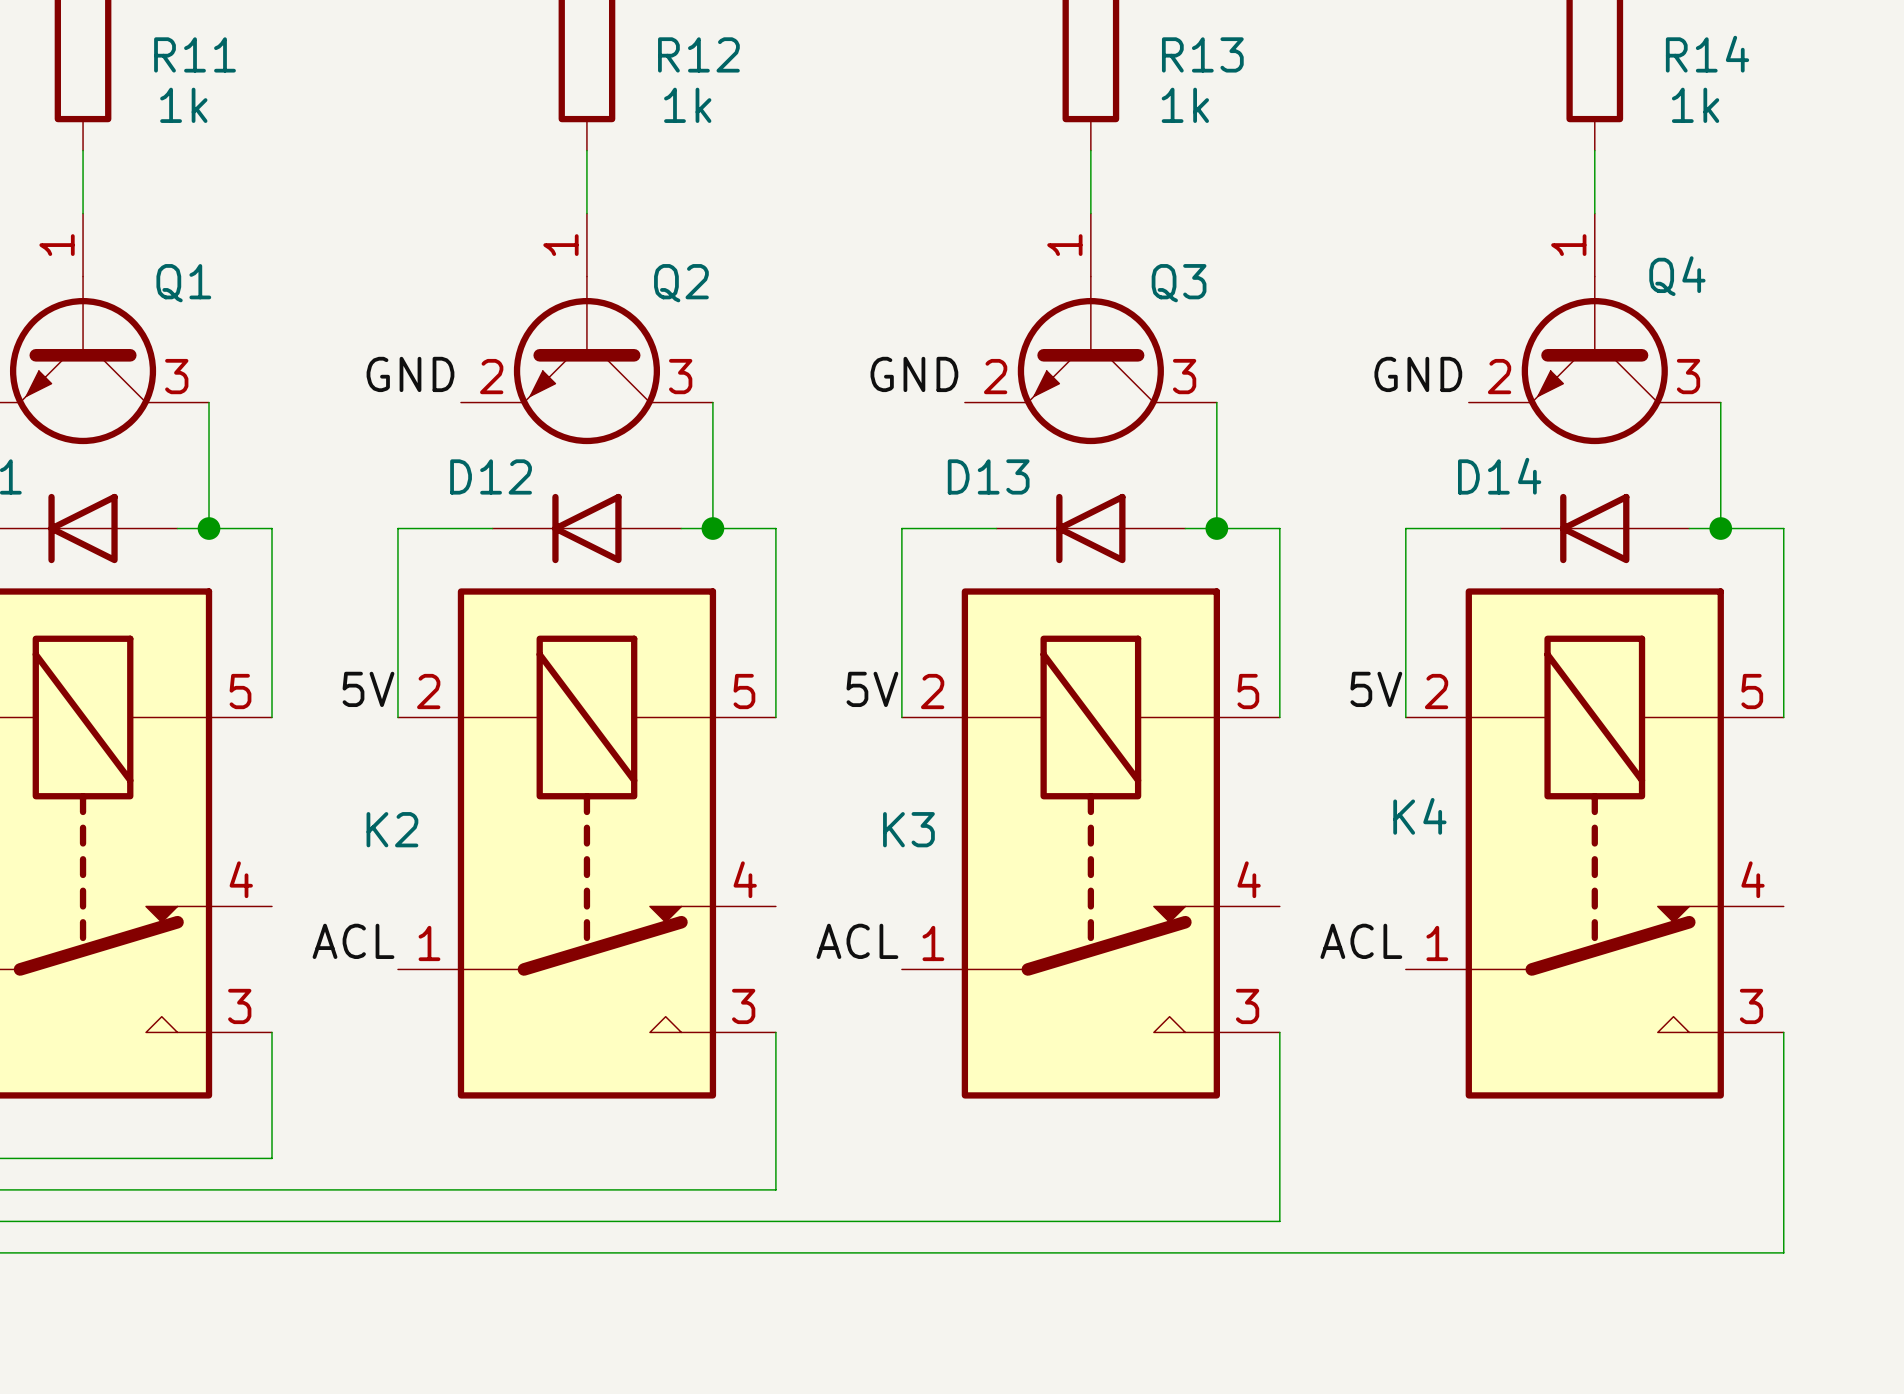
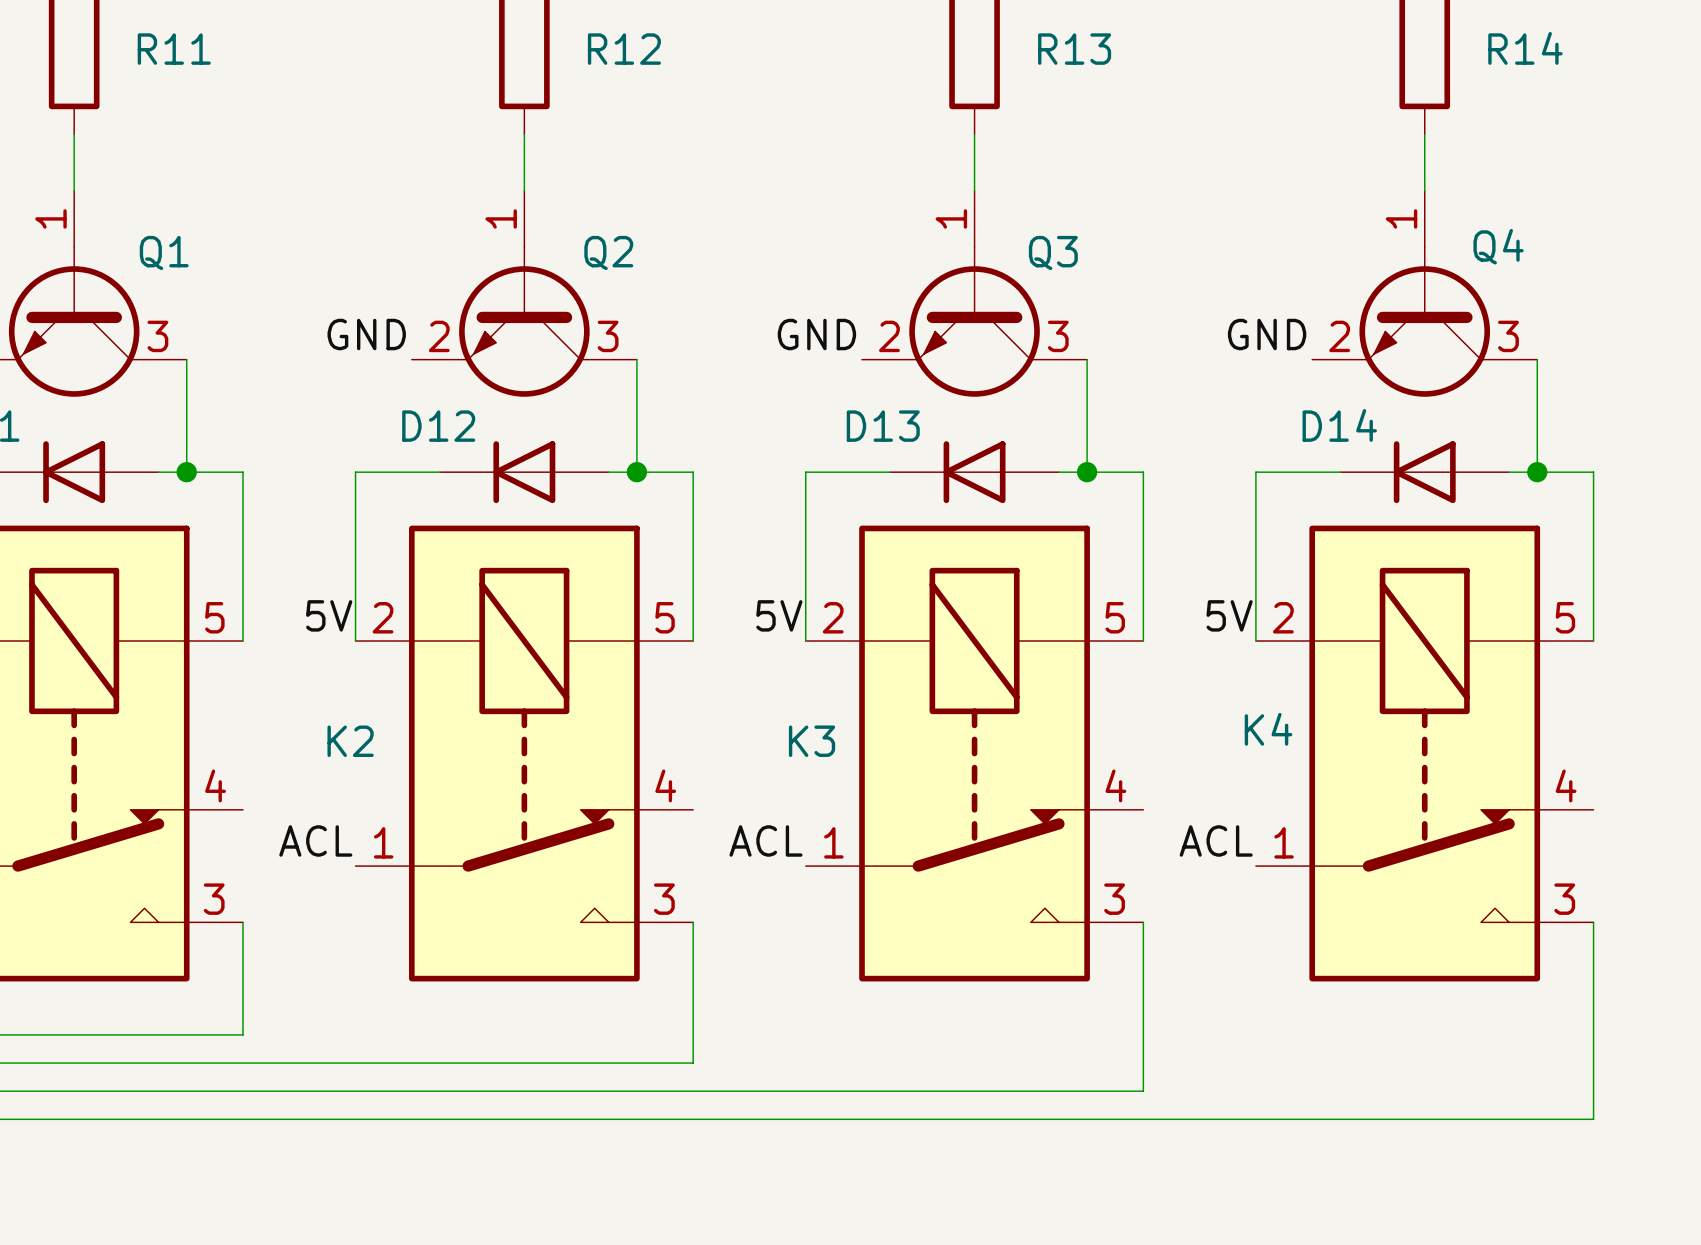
R11 value: 1k (183, 105) -> none
R12 value: 1k (687, 105) -> none
R13 value: 1k (1185, 105) -> none
R14 value: 1k (1695, 105) -> none

